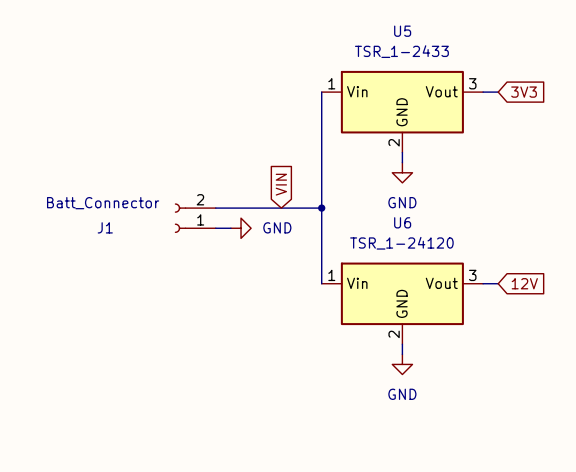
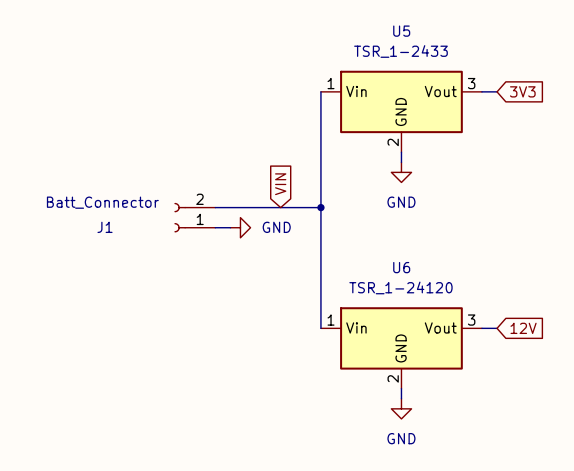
wire: none -> (320, 283) (320, 328)
wire: (483, 283) (498, 283) -> (481, 328) (497, 328)
global label position: 12V (524, 283) -> 12V (523, 328)
U6 position: (402, 303) -> (401, 347)
power symbol position: GND (402, 364) -> GND (401, 408)

